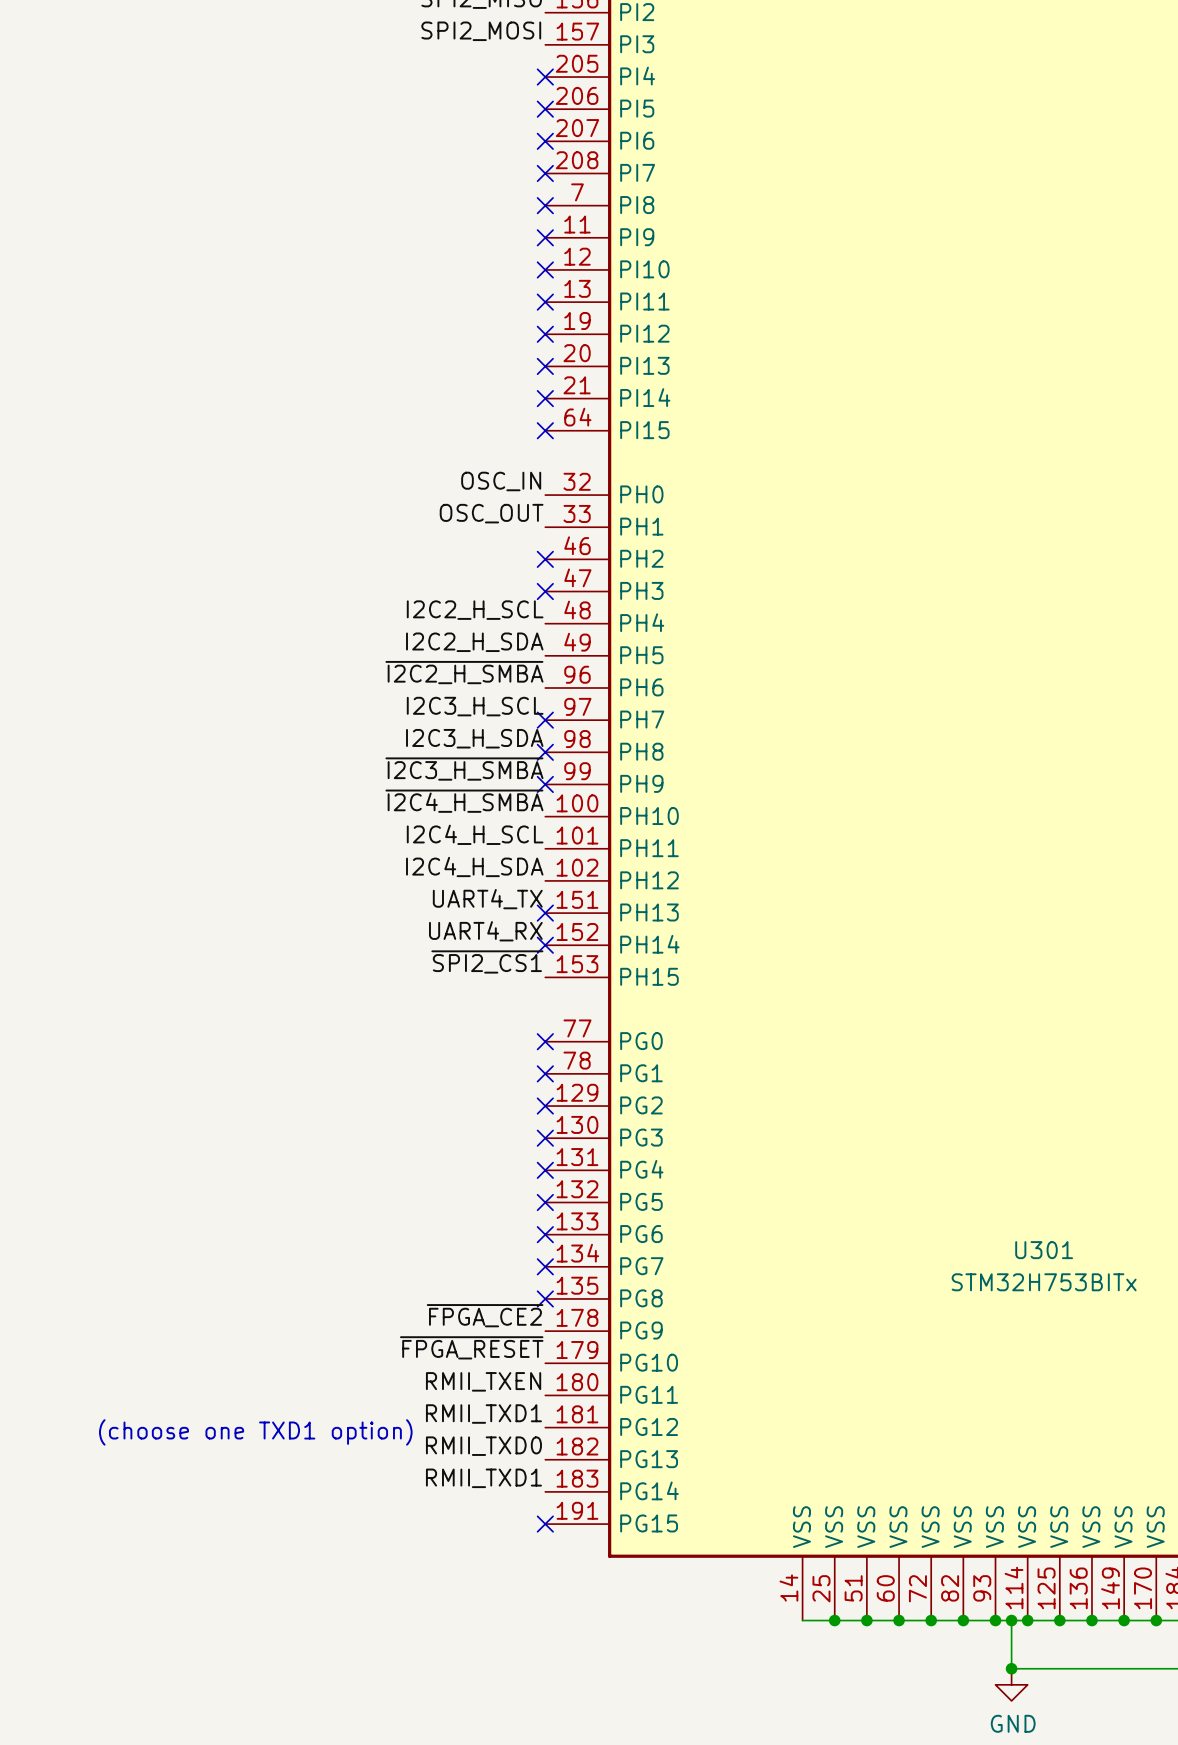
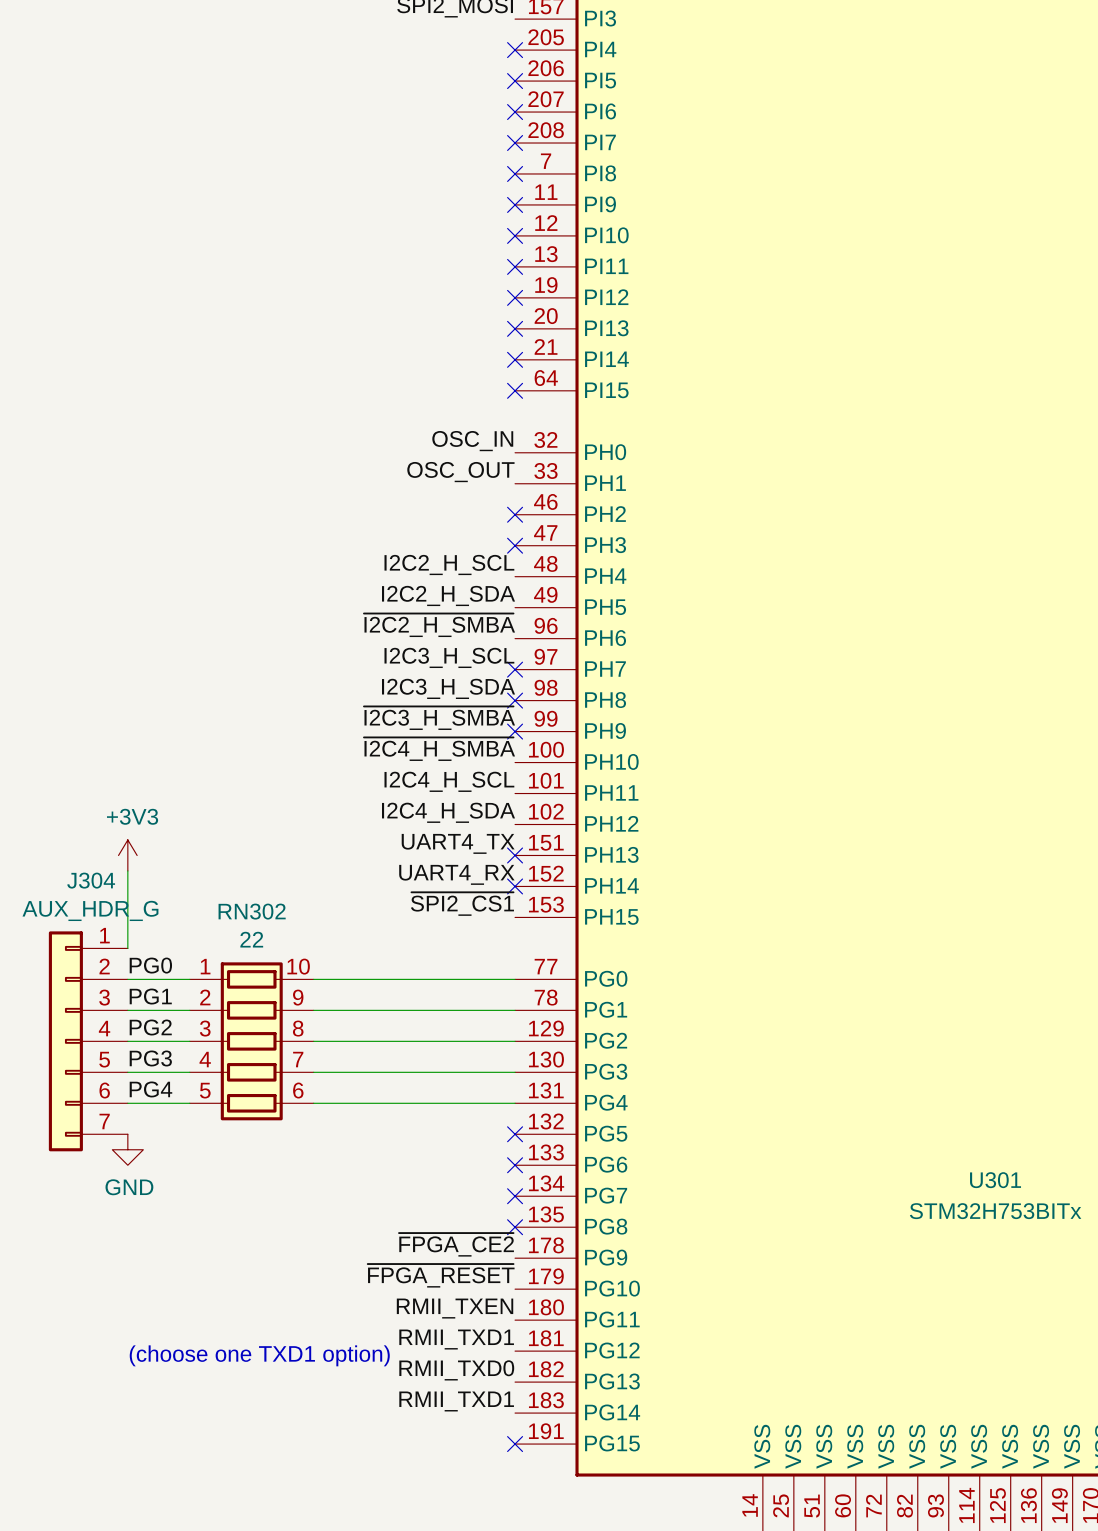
power symbol: none -> +3V3 (127, 855)
wire: none -> (127, 870) (127, 948)
label: none -> PG0 (150, 965)
wire: none -> (127, 979) (189, 979)
wire: none -> (313, 979) (515, 979)
no-connect mark: (545, 1041) -> none
label: none -> PG1 (150, 996)
wire: none -> (127, 1010) (189, 1010)
wire: none -> (313, 1010) (515, 1010)
no-connect mark: (545, 1073) -> none
label: none -> PG2 (150, 1027)
J304: none -> AUX_HDR_G (88, 1041)
wire: none -> (127, 1041) (189, 1041)
RN302: none -> 22 (251, 1041)
wire: none -> (313, 1041) (515, 1041)
no-connect mark: (545, 1106) -> none
label: none -> PG3 (150, 1058)
wire: none -> (127, 1072) (189, 1072)
wire: none -> (313, 1072) (515, 1072)
no-connect mark: (545, 1138) -> none
label: none -> PG4 (150, 1089)
wire: none -> (127, 1103) (189, 1103)
wire: none -> (313, 1103) (515, 1103)
no-connect mark: (545, 1170) -> none
power symbol: none -> GND (127, 1149)

